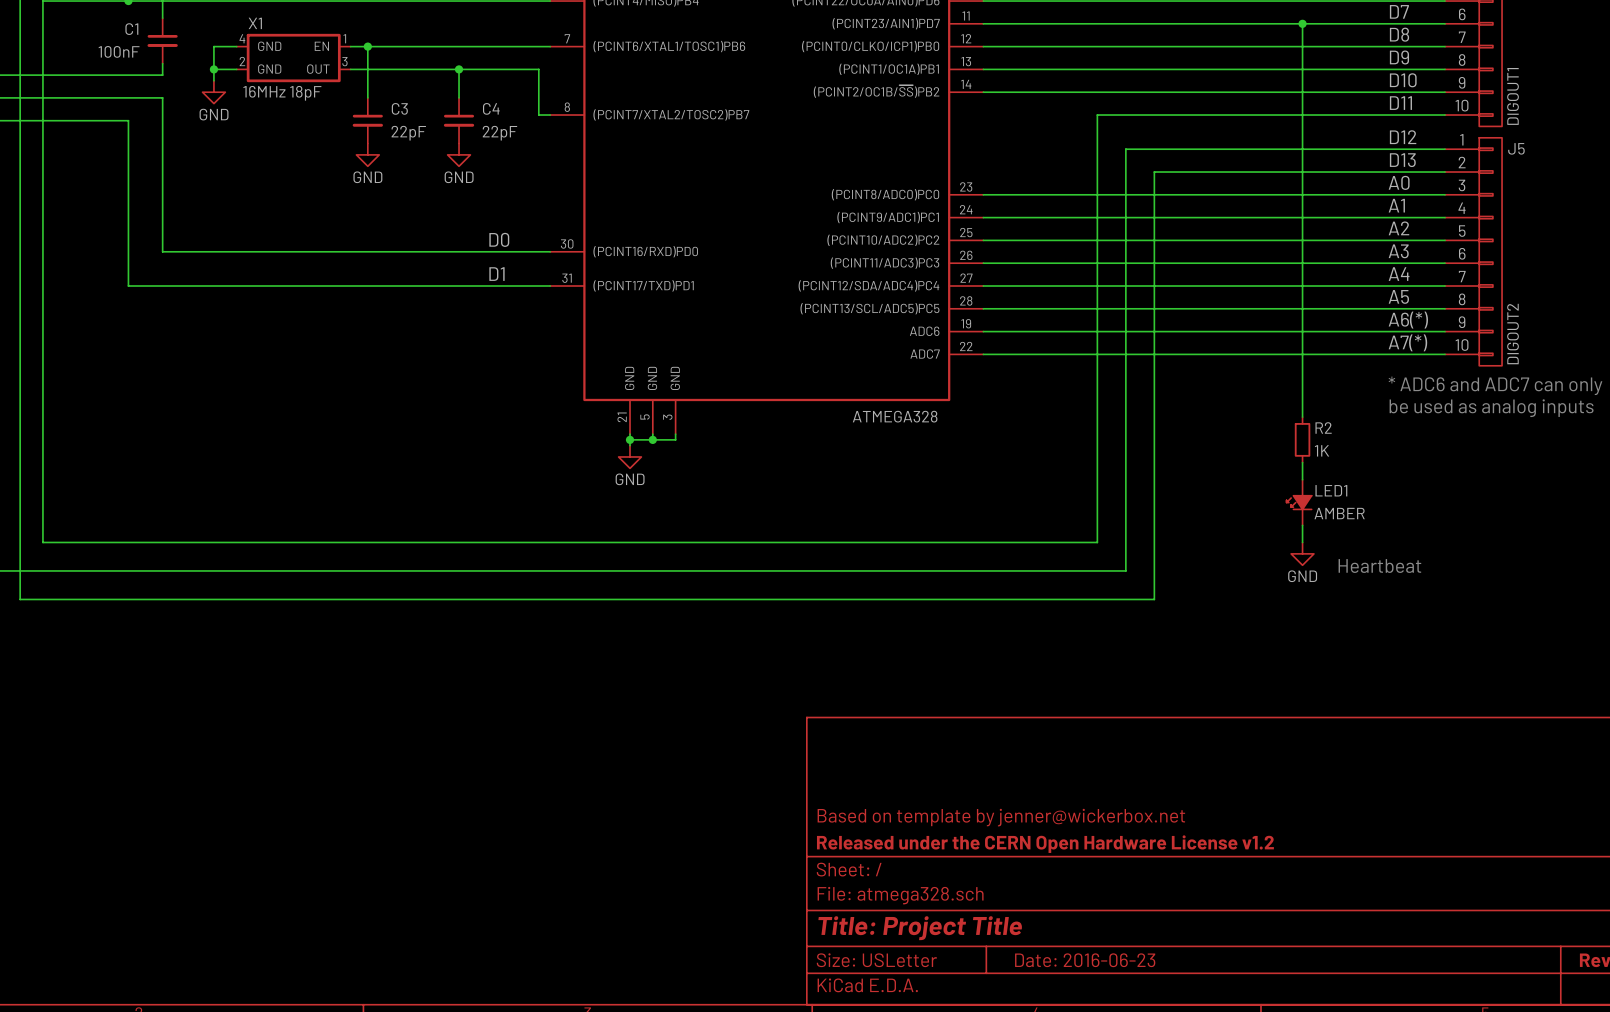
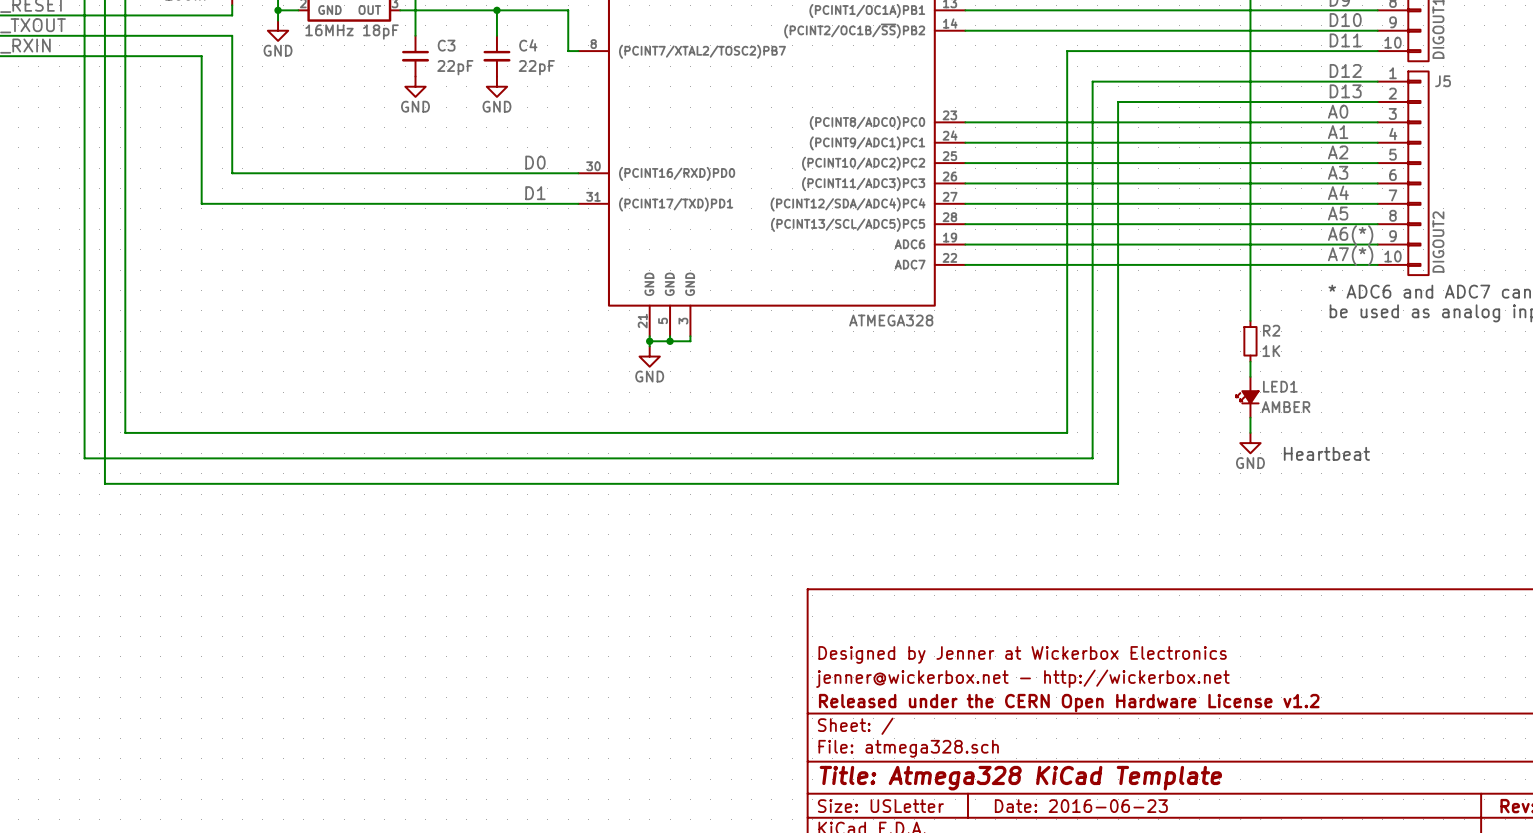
title block: none -> Designed by Jenner at Wickerbox Electronics (1022, 654)
title block: Based on template by jenner@wickerbox.net (1001, 817) -> jenner@wickerbox.net - http://wickerbox.net (1022, 678)
title block: Title: Project Title (920, 928) -> Title: Atmega328 KiCad Template (1020, 778)

